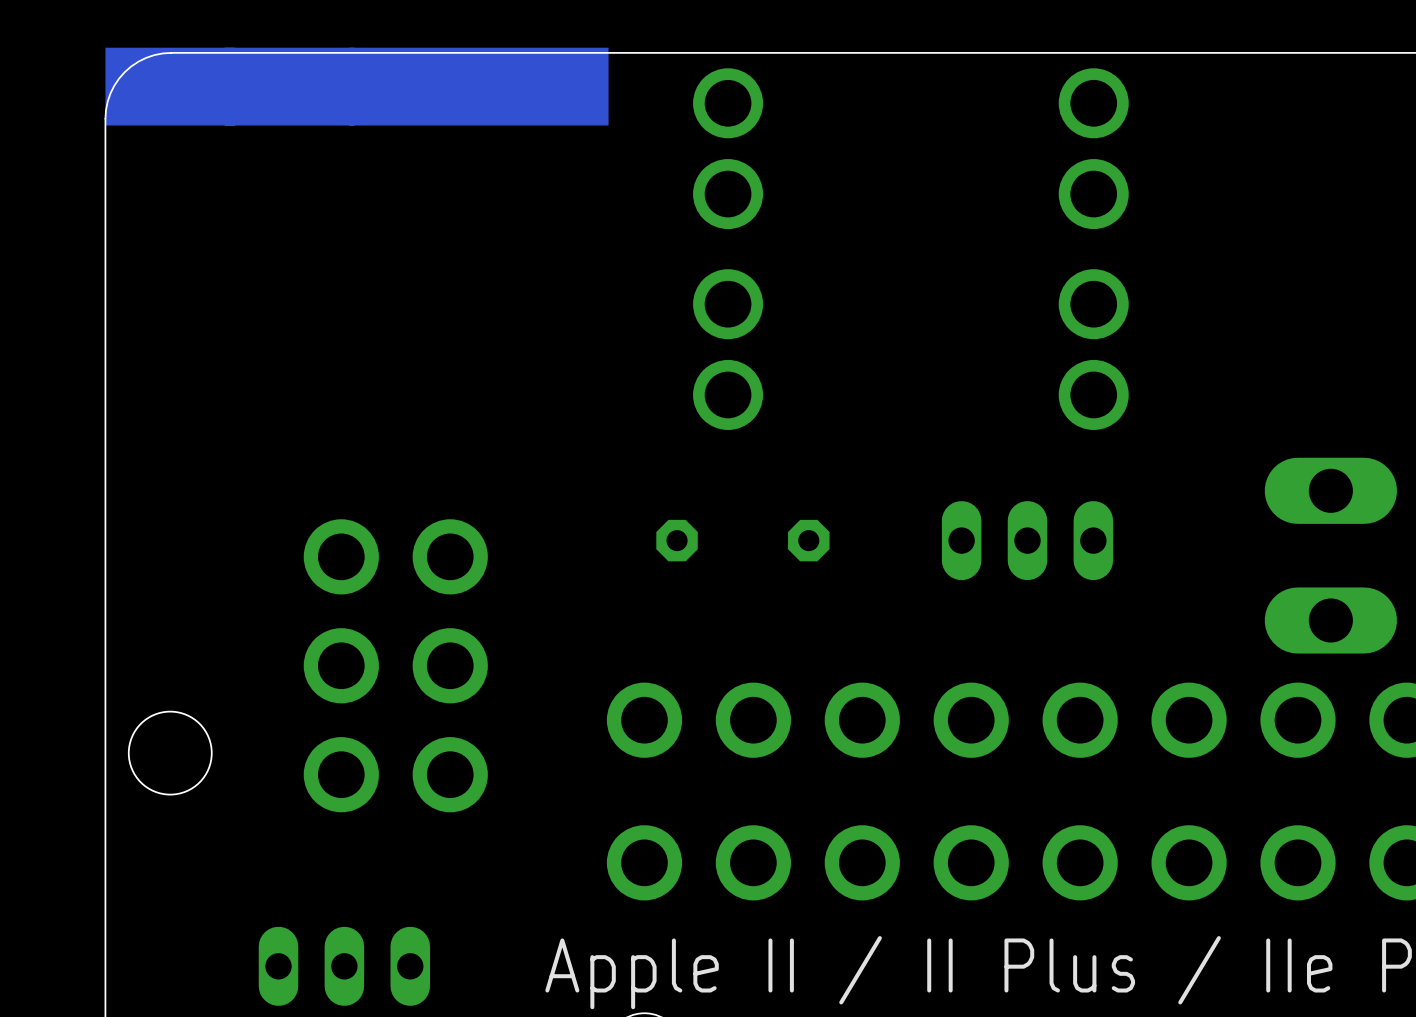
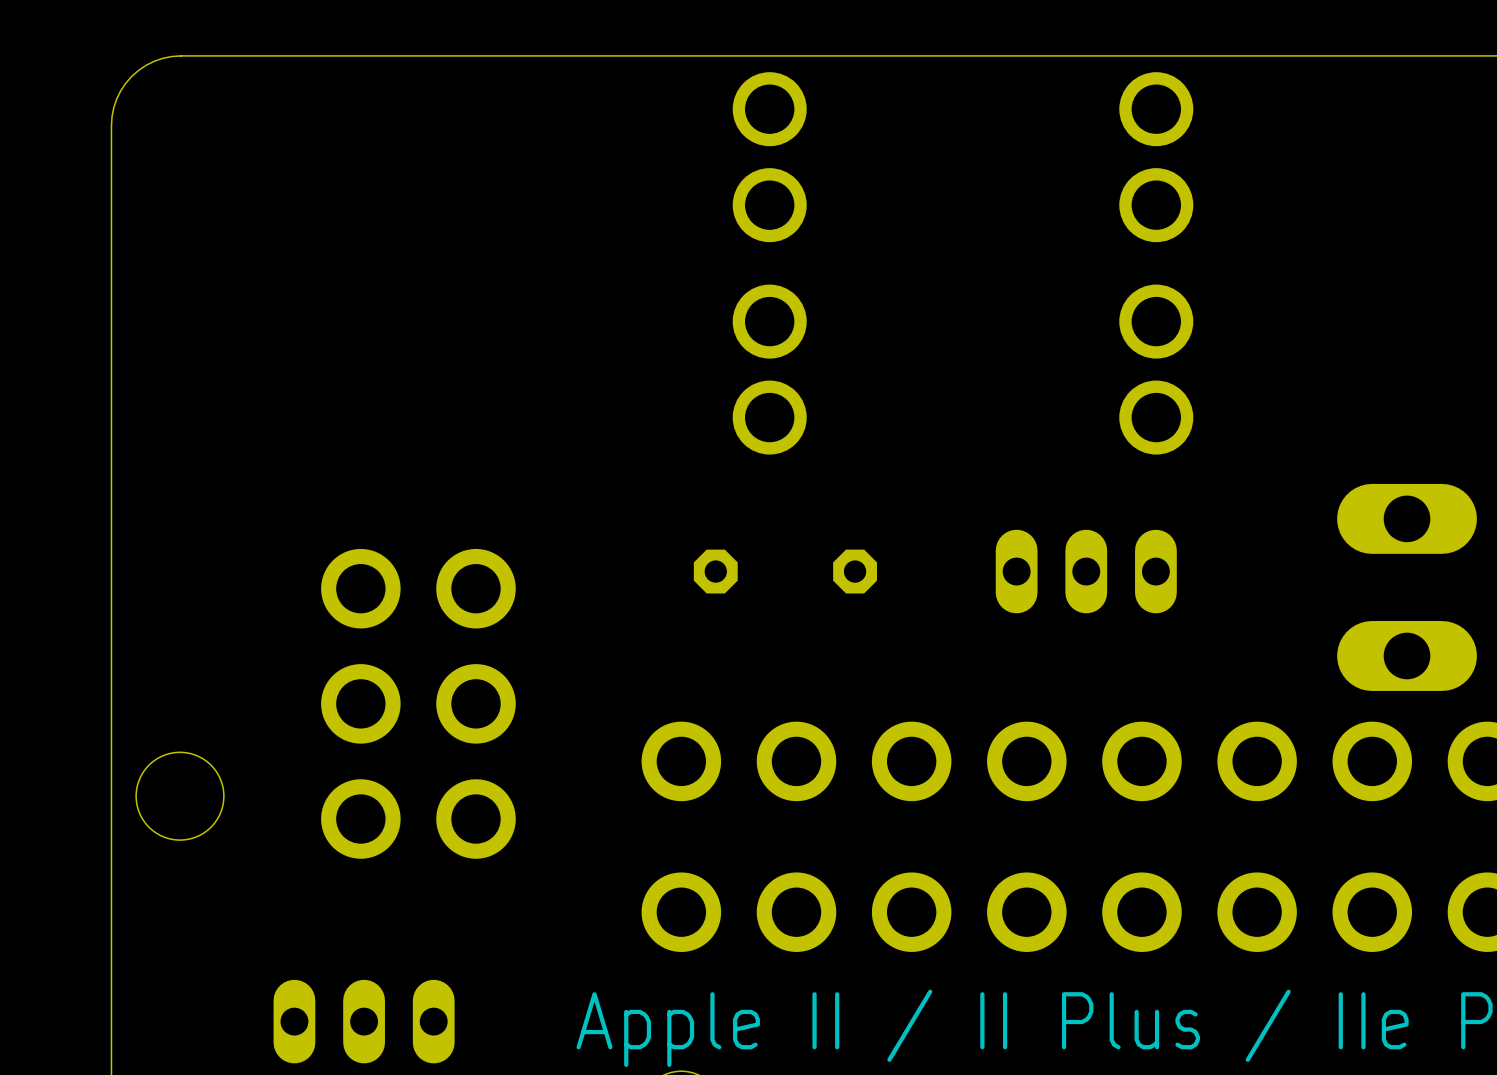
part: (170, 86) -> none
part: (289, 86) -> none
part: (414, 86) -> none
part: (543, 86) -> none

